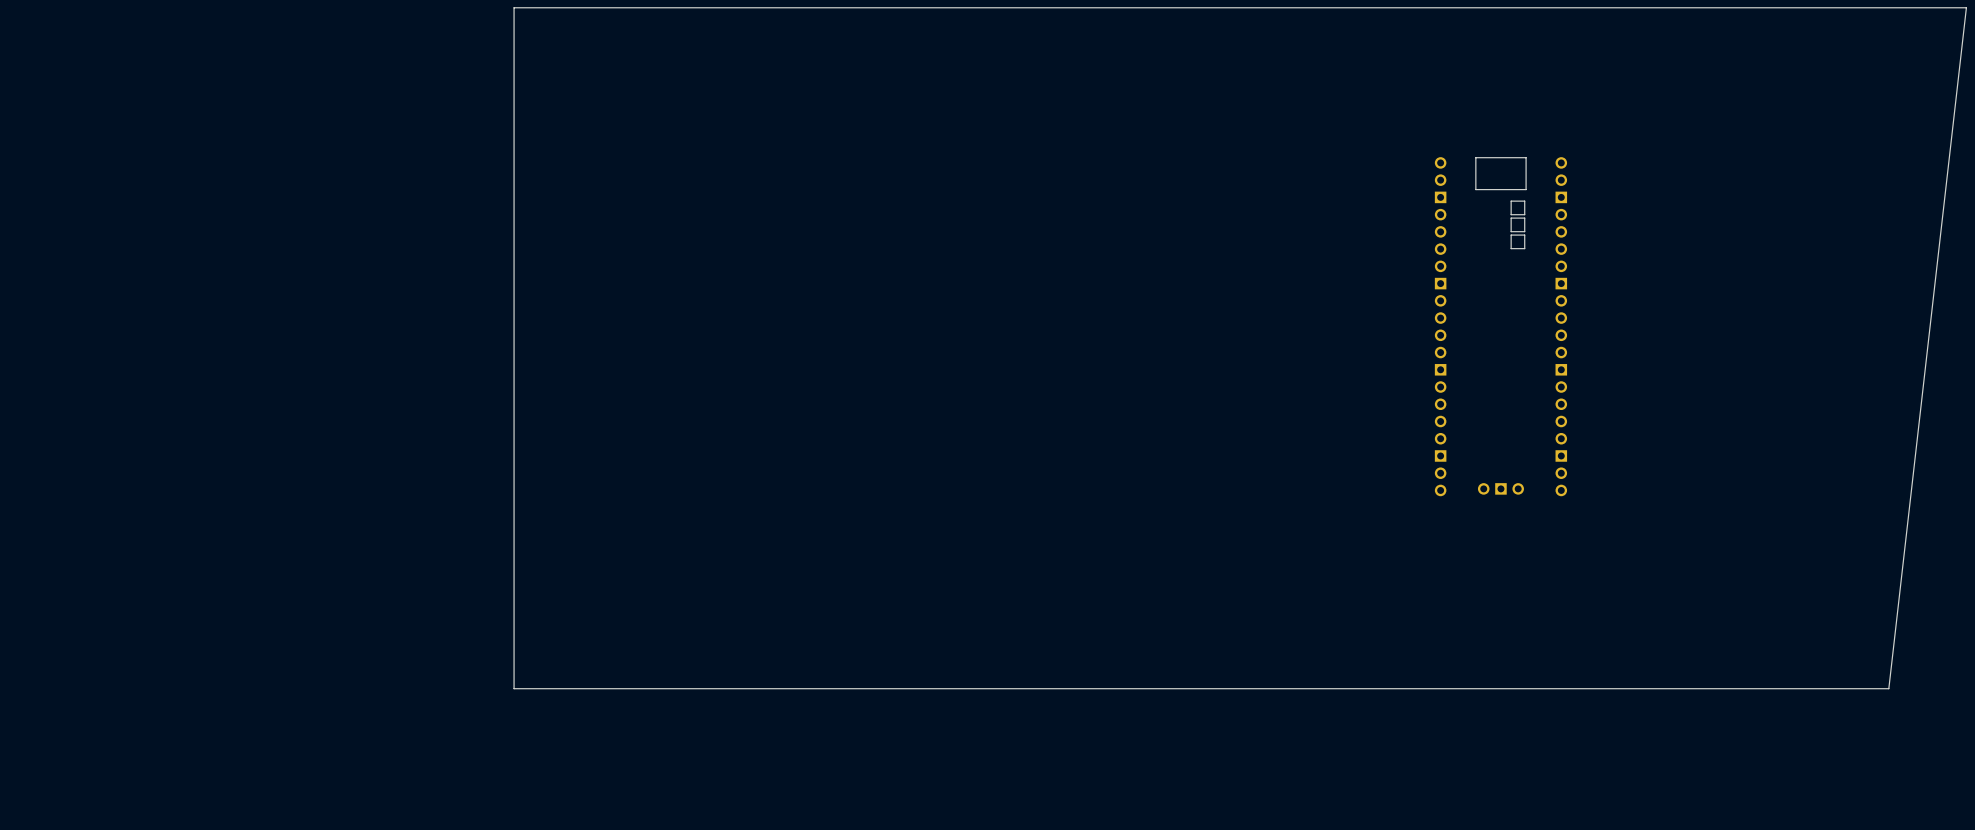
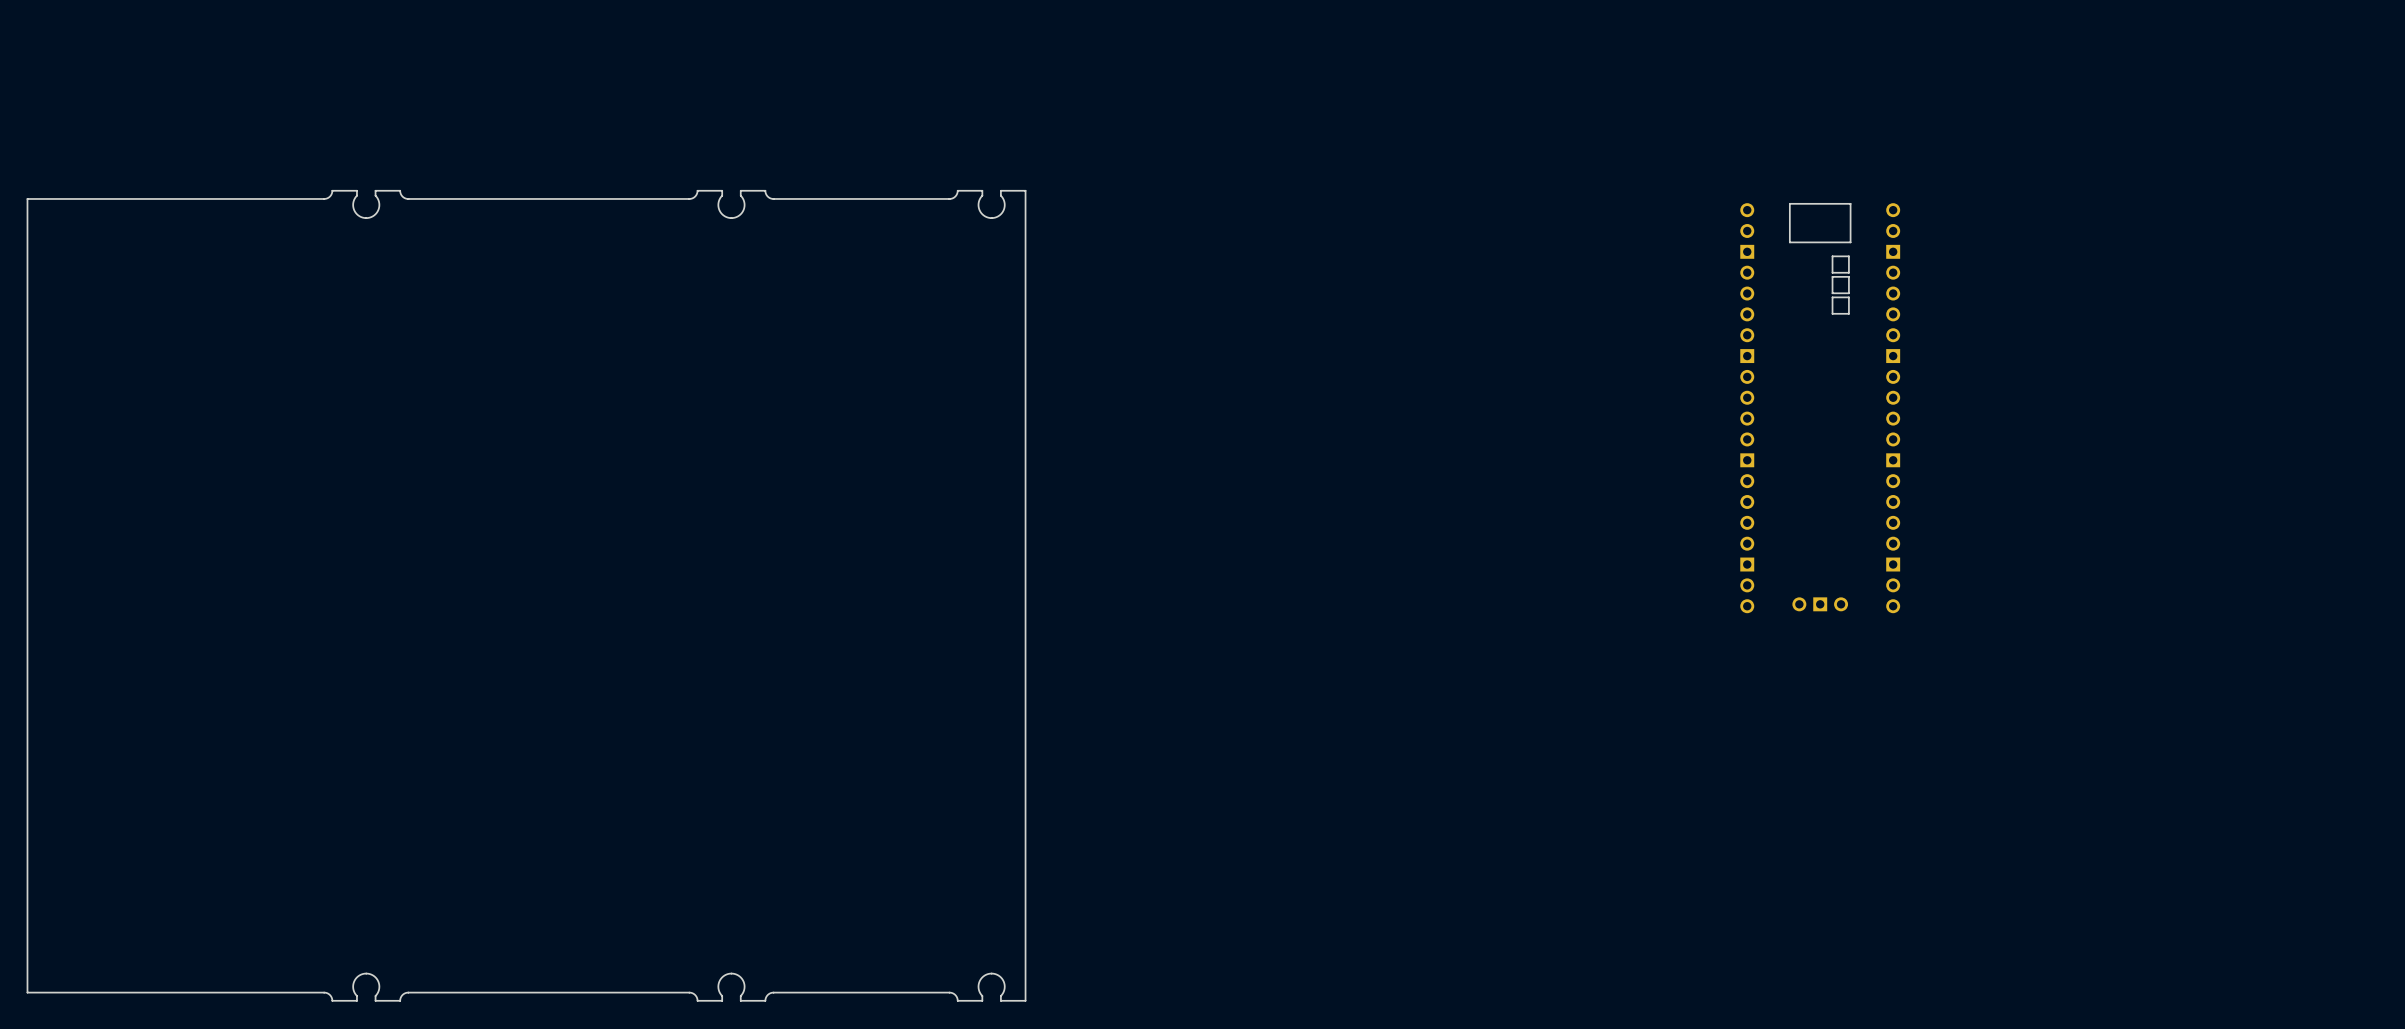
board edge: (1966, 7) (1888, 688) (514, 688) (514, 7) (1966, 7) -> none
board edge: none -> (1025, 190) (1025, 1000) (1000, 1000) (1004, 988) (1003, 981) (999, 976) (991, 973) (983, 976) (979, 981) (978, 988) (982, 1000) (957, 1000) (955, 995) (949, 992) (773, 992) (767, 995) (765, 1000) (740, 1000) (744, 988) (743, 981) (739, 976) (731, 973) (723, 976) (719, 981) (718, 988) (722, 1000) (697, 1000) (695, 995) (689, 992) (408, 992) (402, 995) (400, 1000) (375, 1000) (379, 988) (378, 981) (374, 976) (366, 973) (358, 976) (354, 981) (353, 988) (356, 1000) (332, 1000) (329, 995) (324, 992) (27, 992) (27, 198) (324, 198) (329, 196) (332, 190) (356, 190) (353, 203) (354, 210) (358, 215) (366, 218) (374, 215) (378, 210) (379, 203) (375, 190) (400, 190) (402, 196) (408, 198) (689, 198) (695, 196) (697, 190) (722, 190) (718, 203) (719, 210) (723, 215) (731, 218) (739, 215) (743, 210) (744, 203) (740, 190) (765, 190) (767, 196) (773, 198) (949, 198) (955, 196) (957, 190) (982, 190) (978, 203) (979, 210) (983, 215) (991, 218) (999, 215) (1003, 210) (1004, 203) (1000, 190) (1025, 190)

